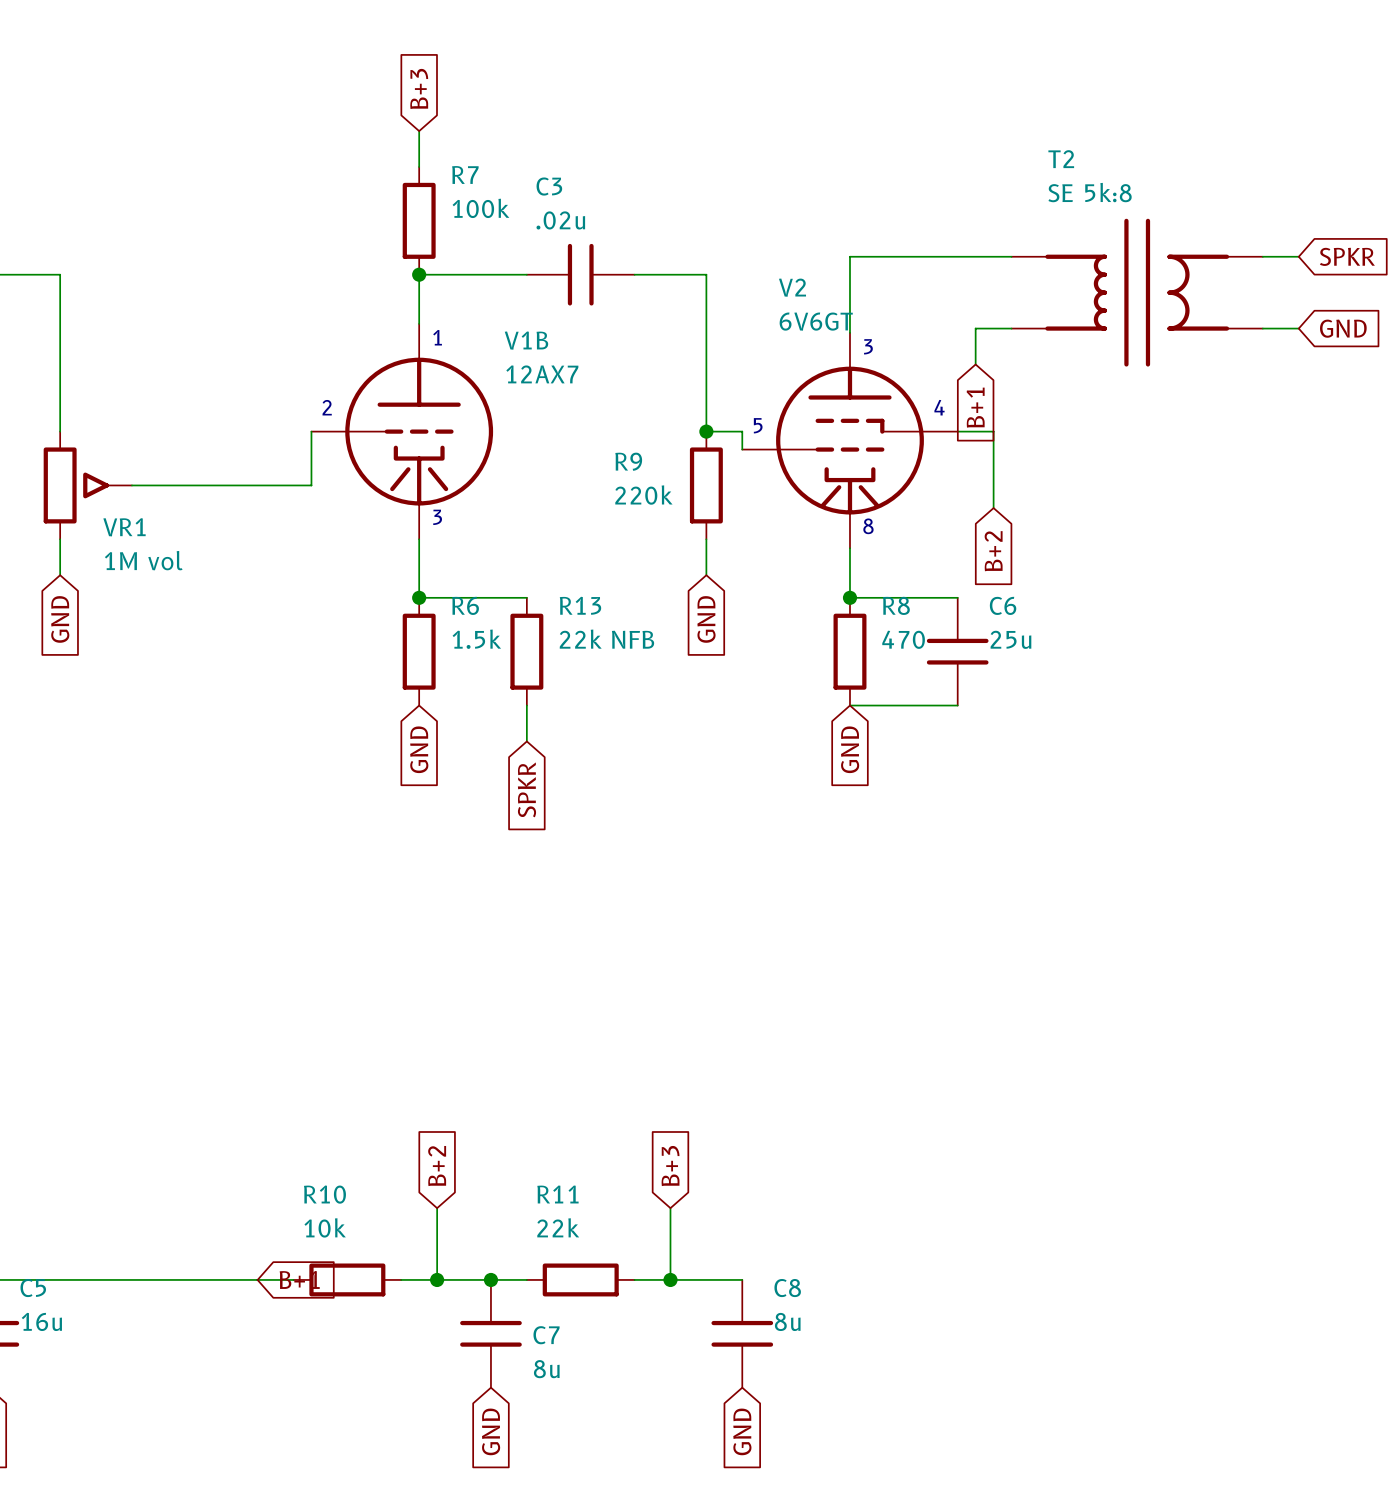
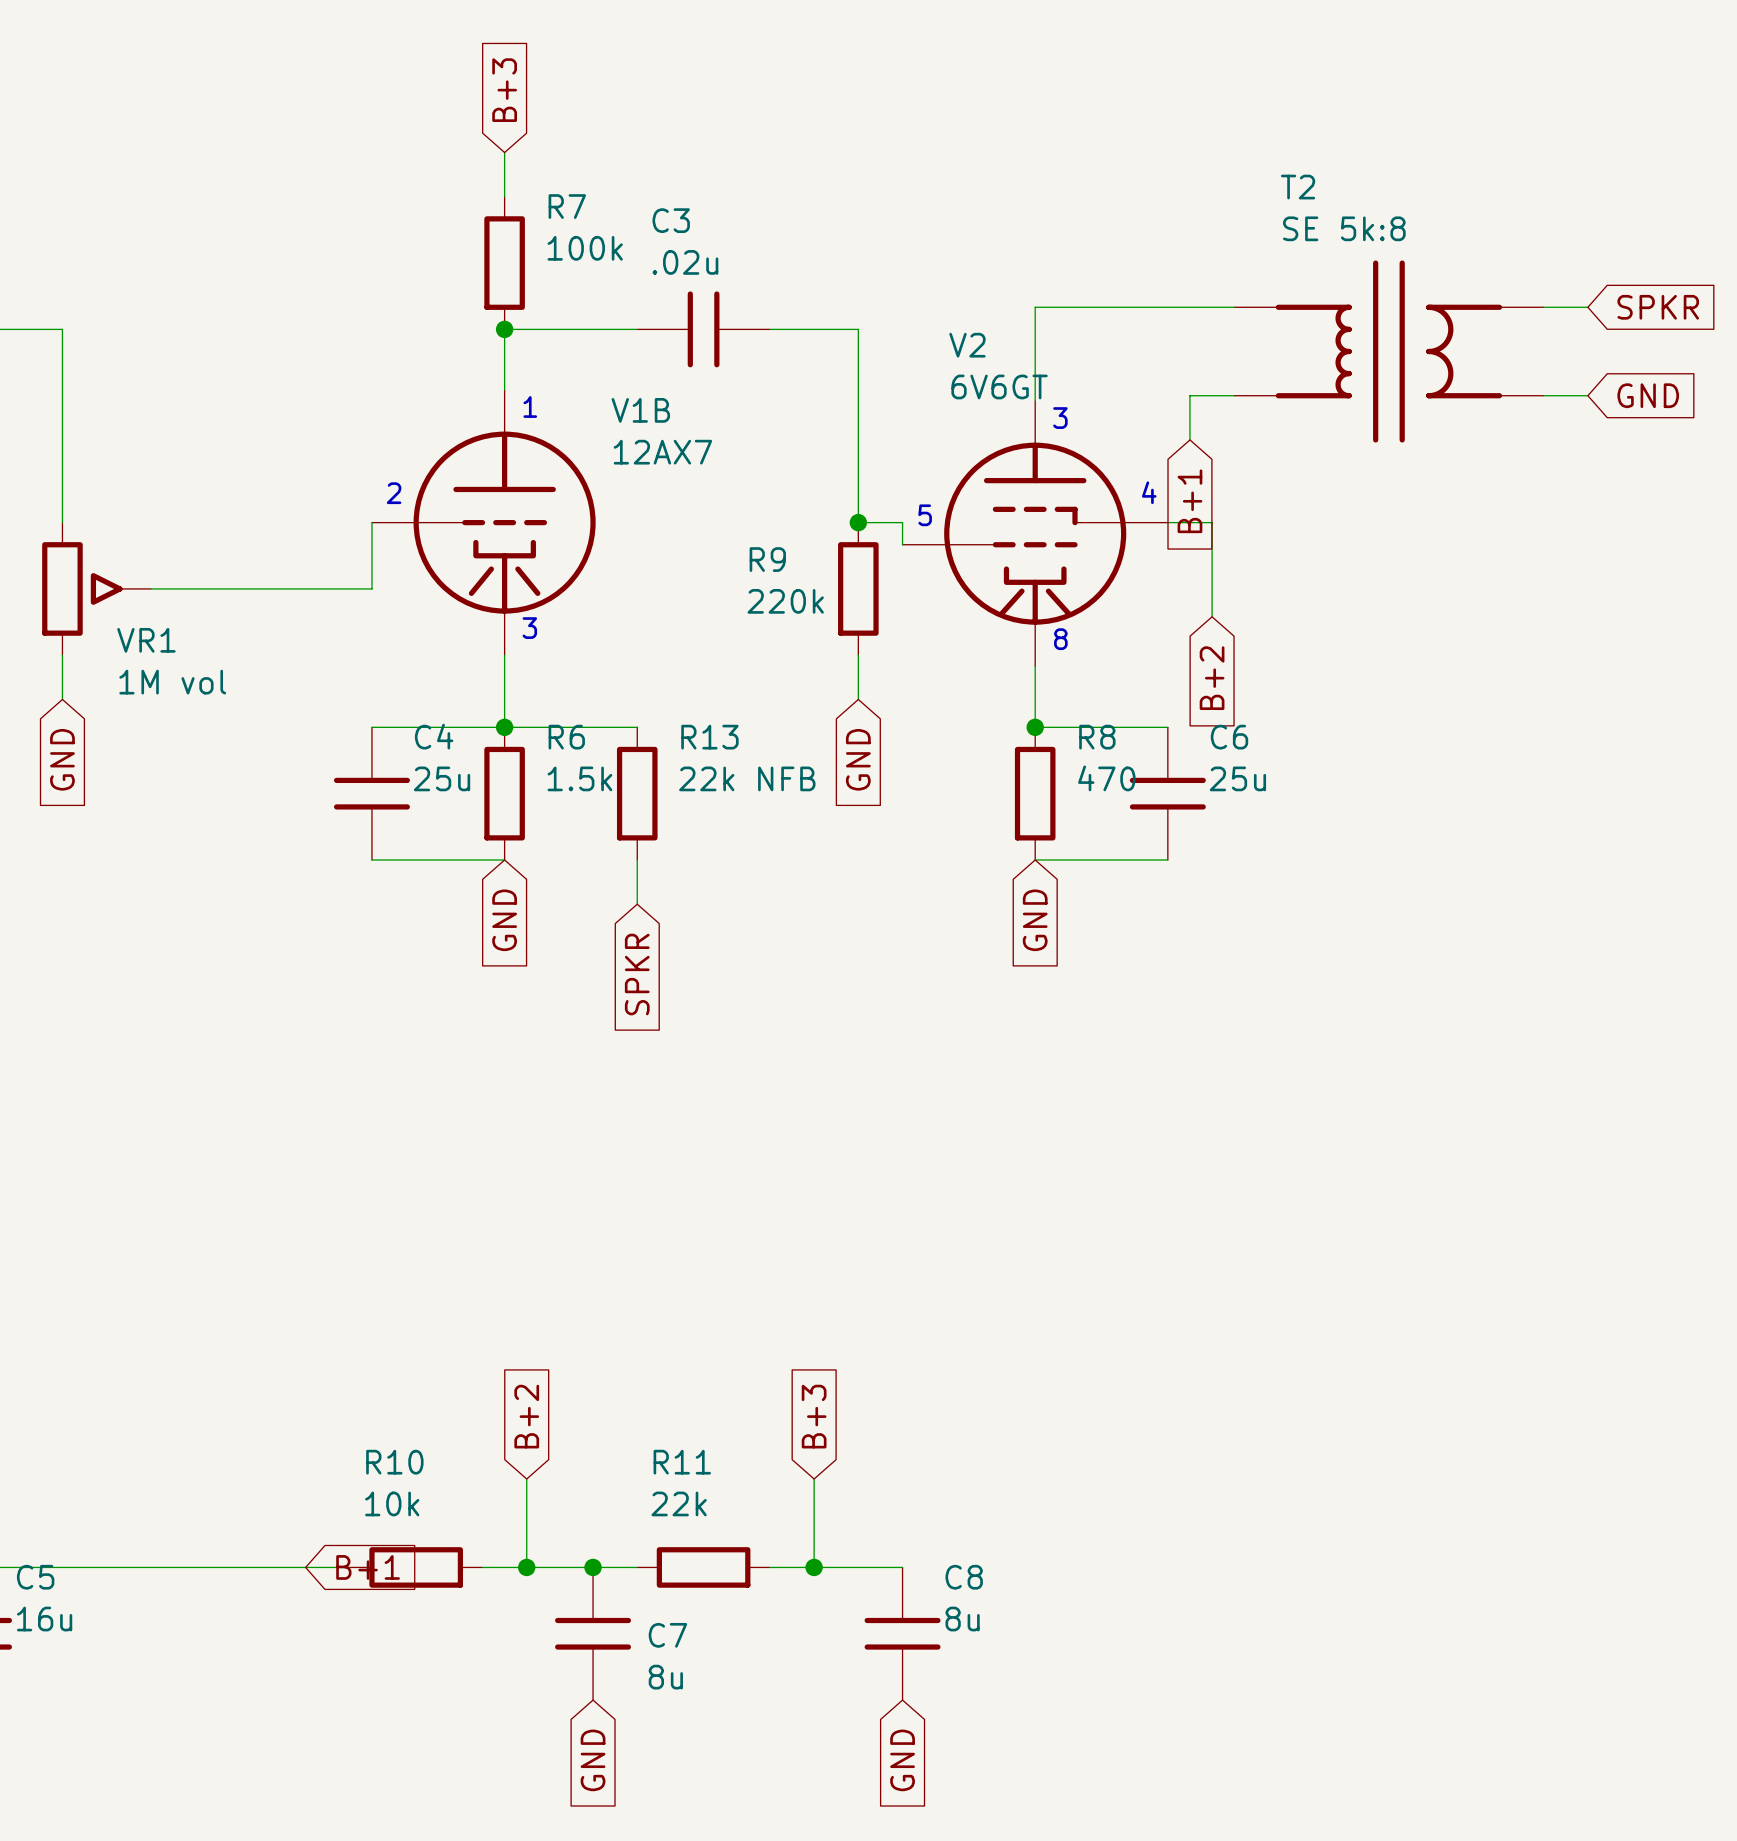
wire: none -> (371, 727) (504, 727)
C4: none -> 25u (371, 793)
wire: none -> (371, 859) (504, 859)

